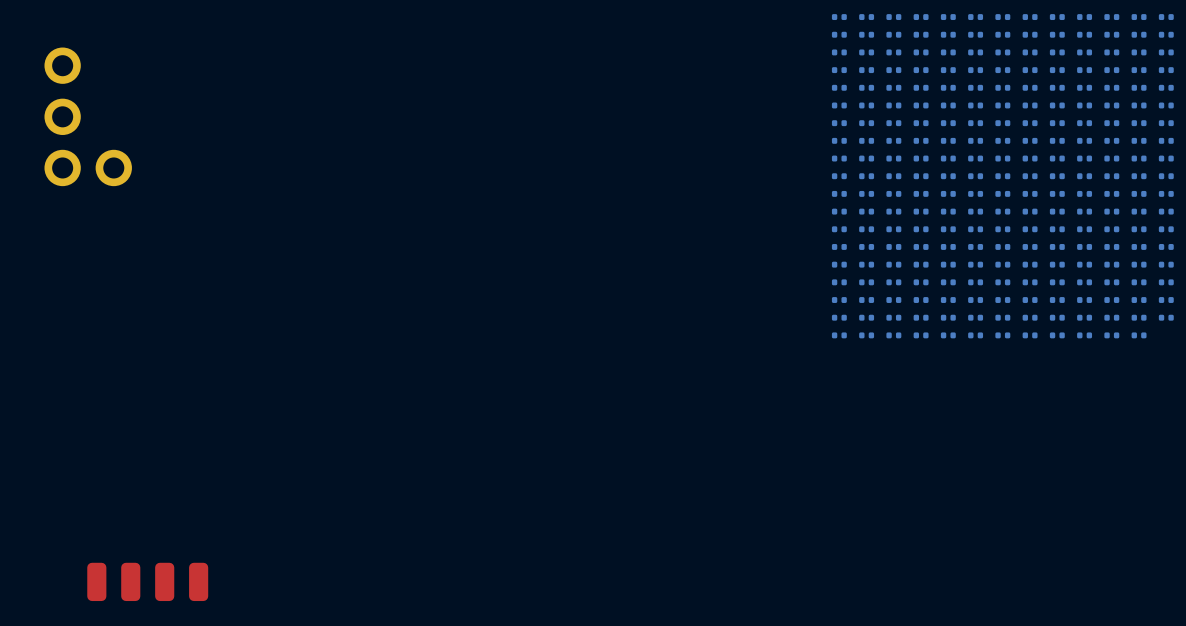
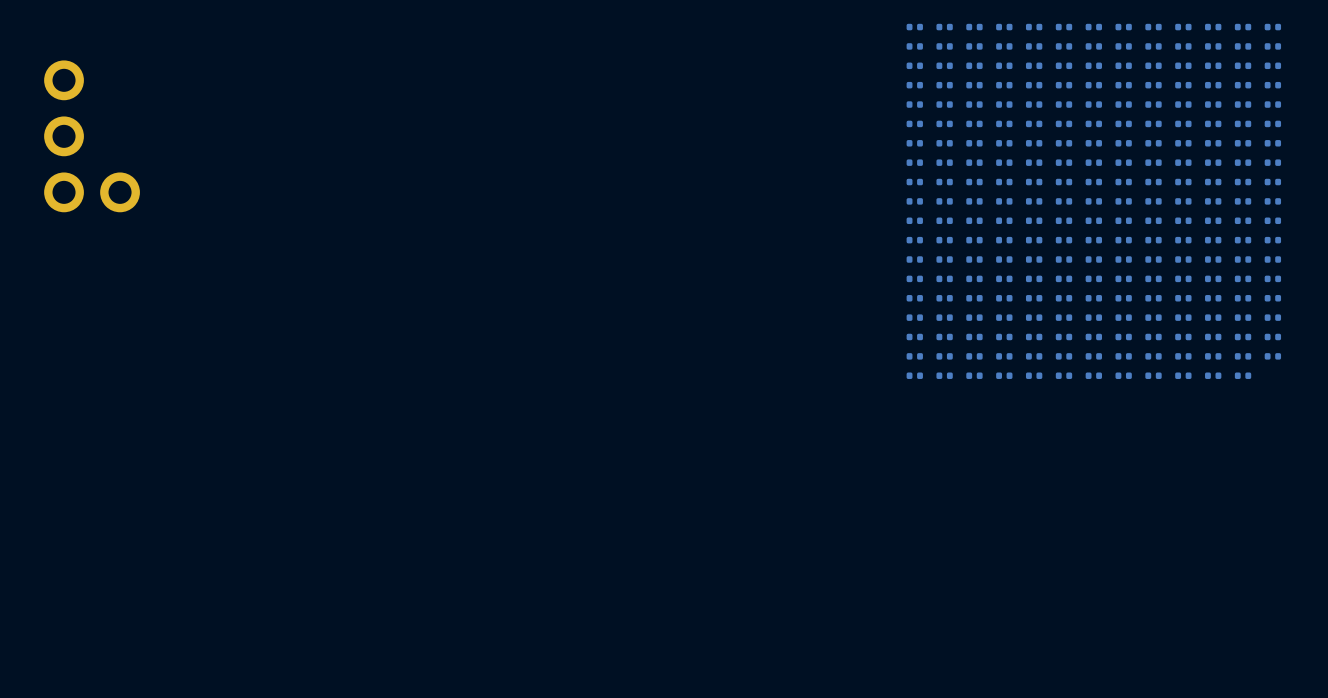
part: (96, 581) -> none
part: (130, 581) -> none
part: (164, 581) -> none
part: (198, 581) -> none

